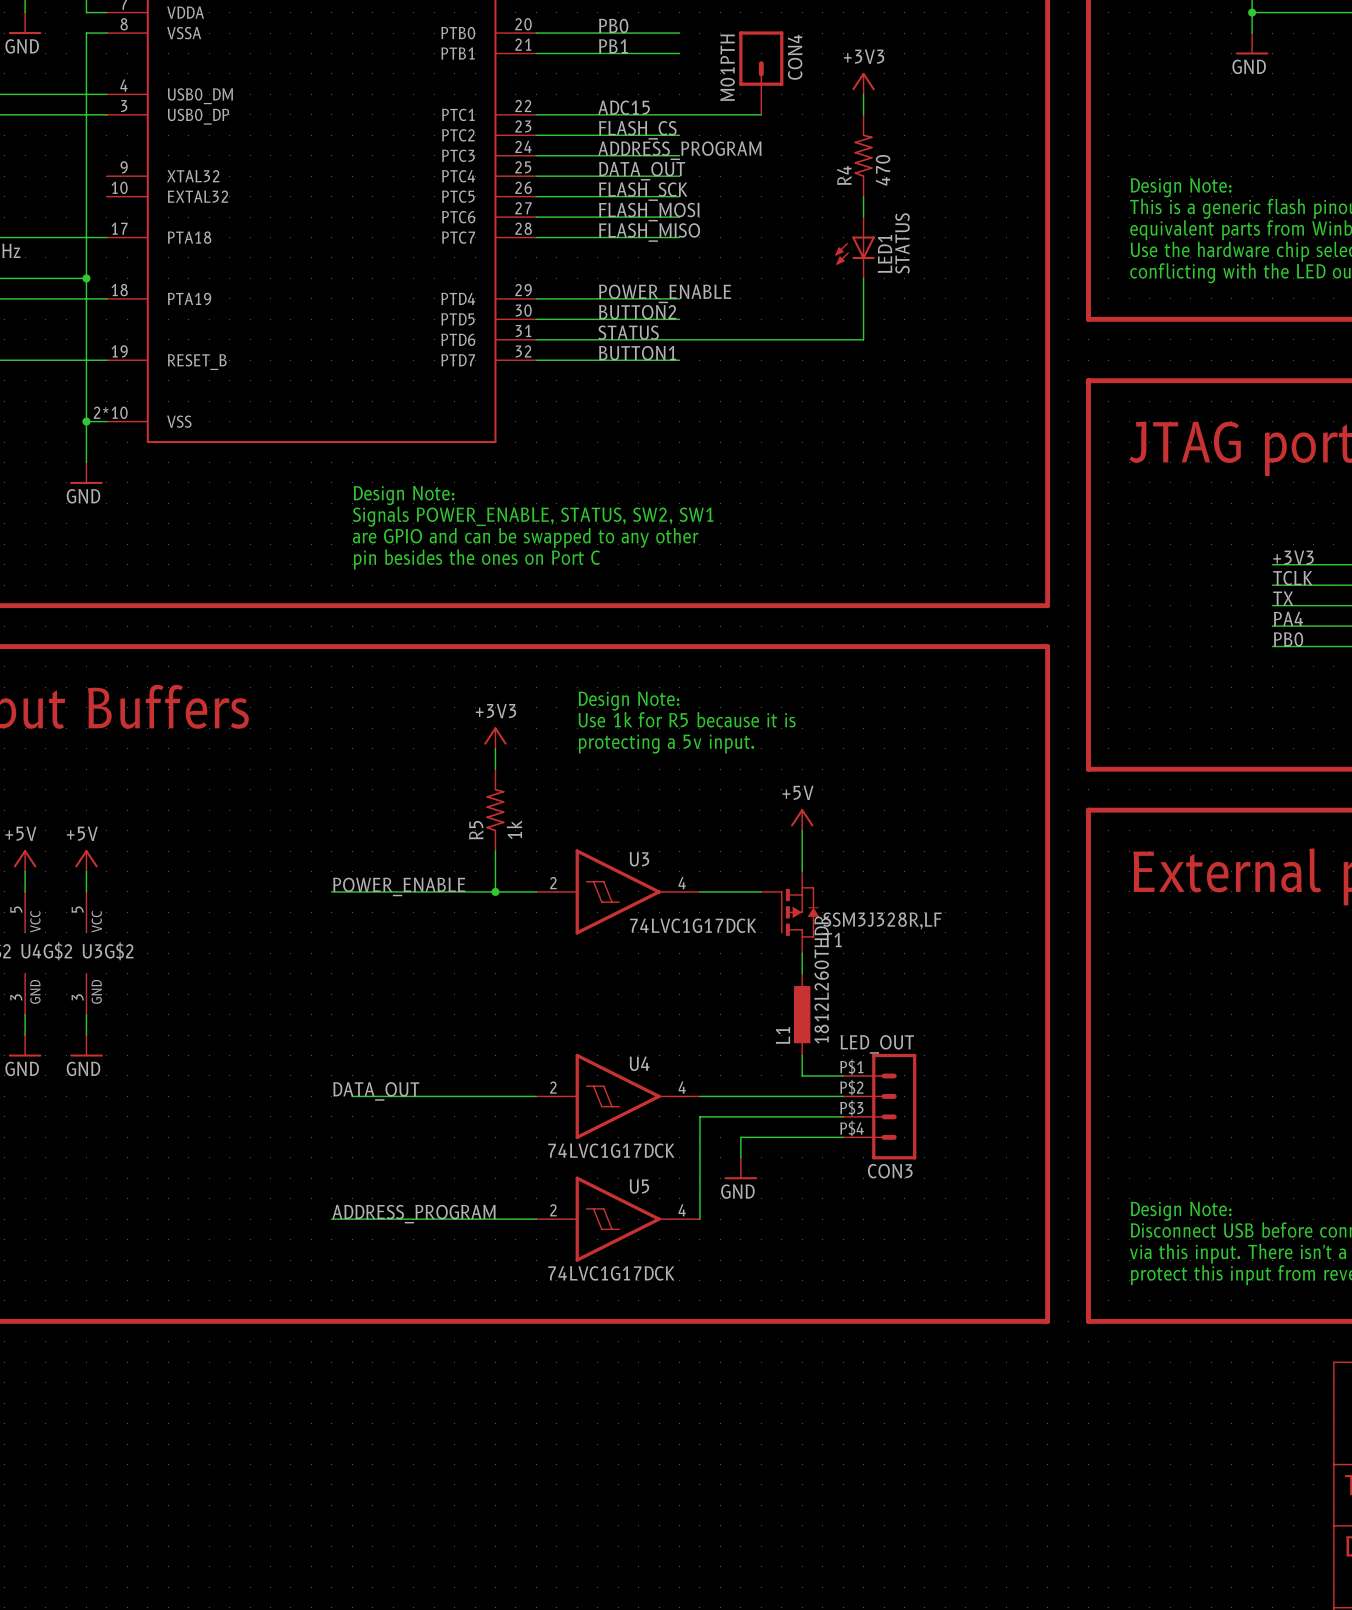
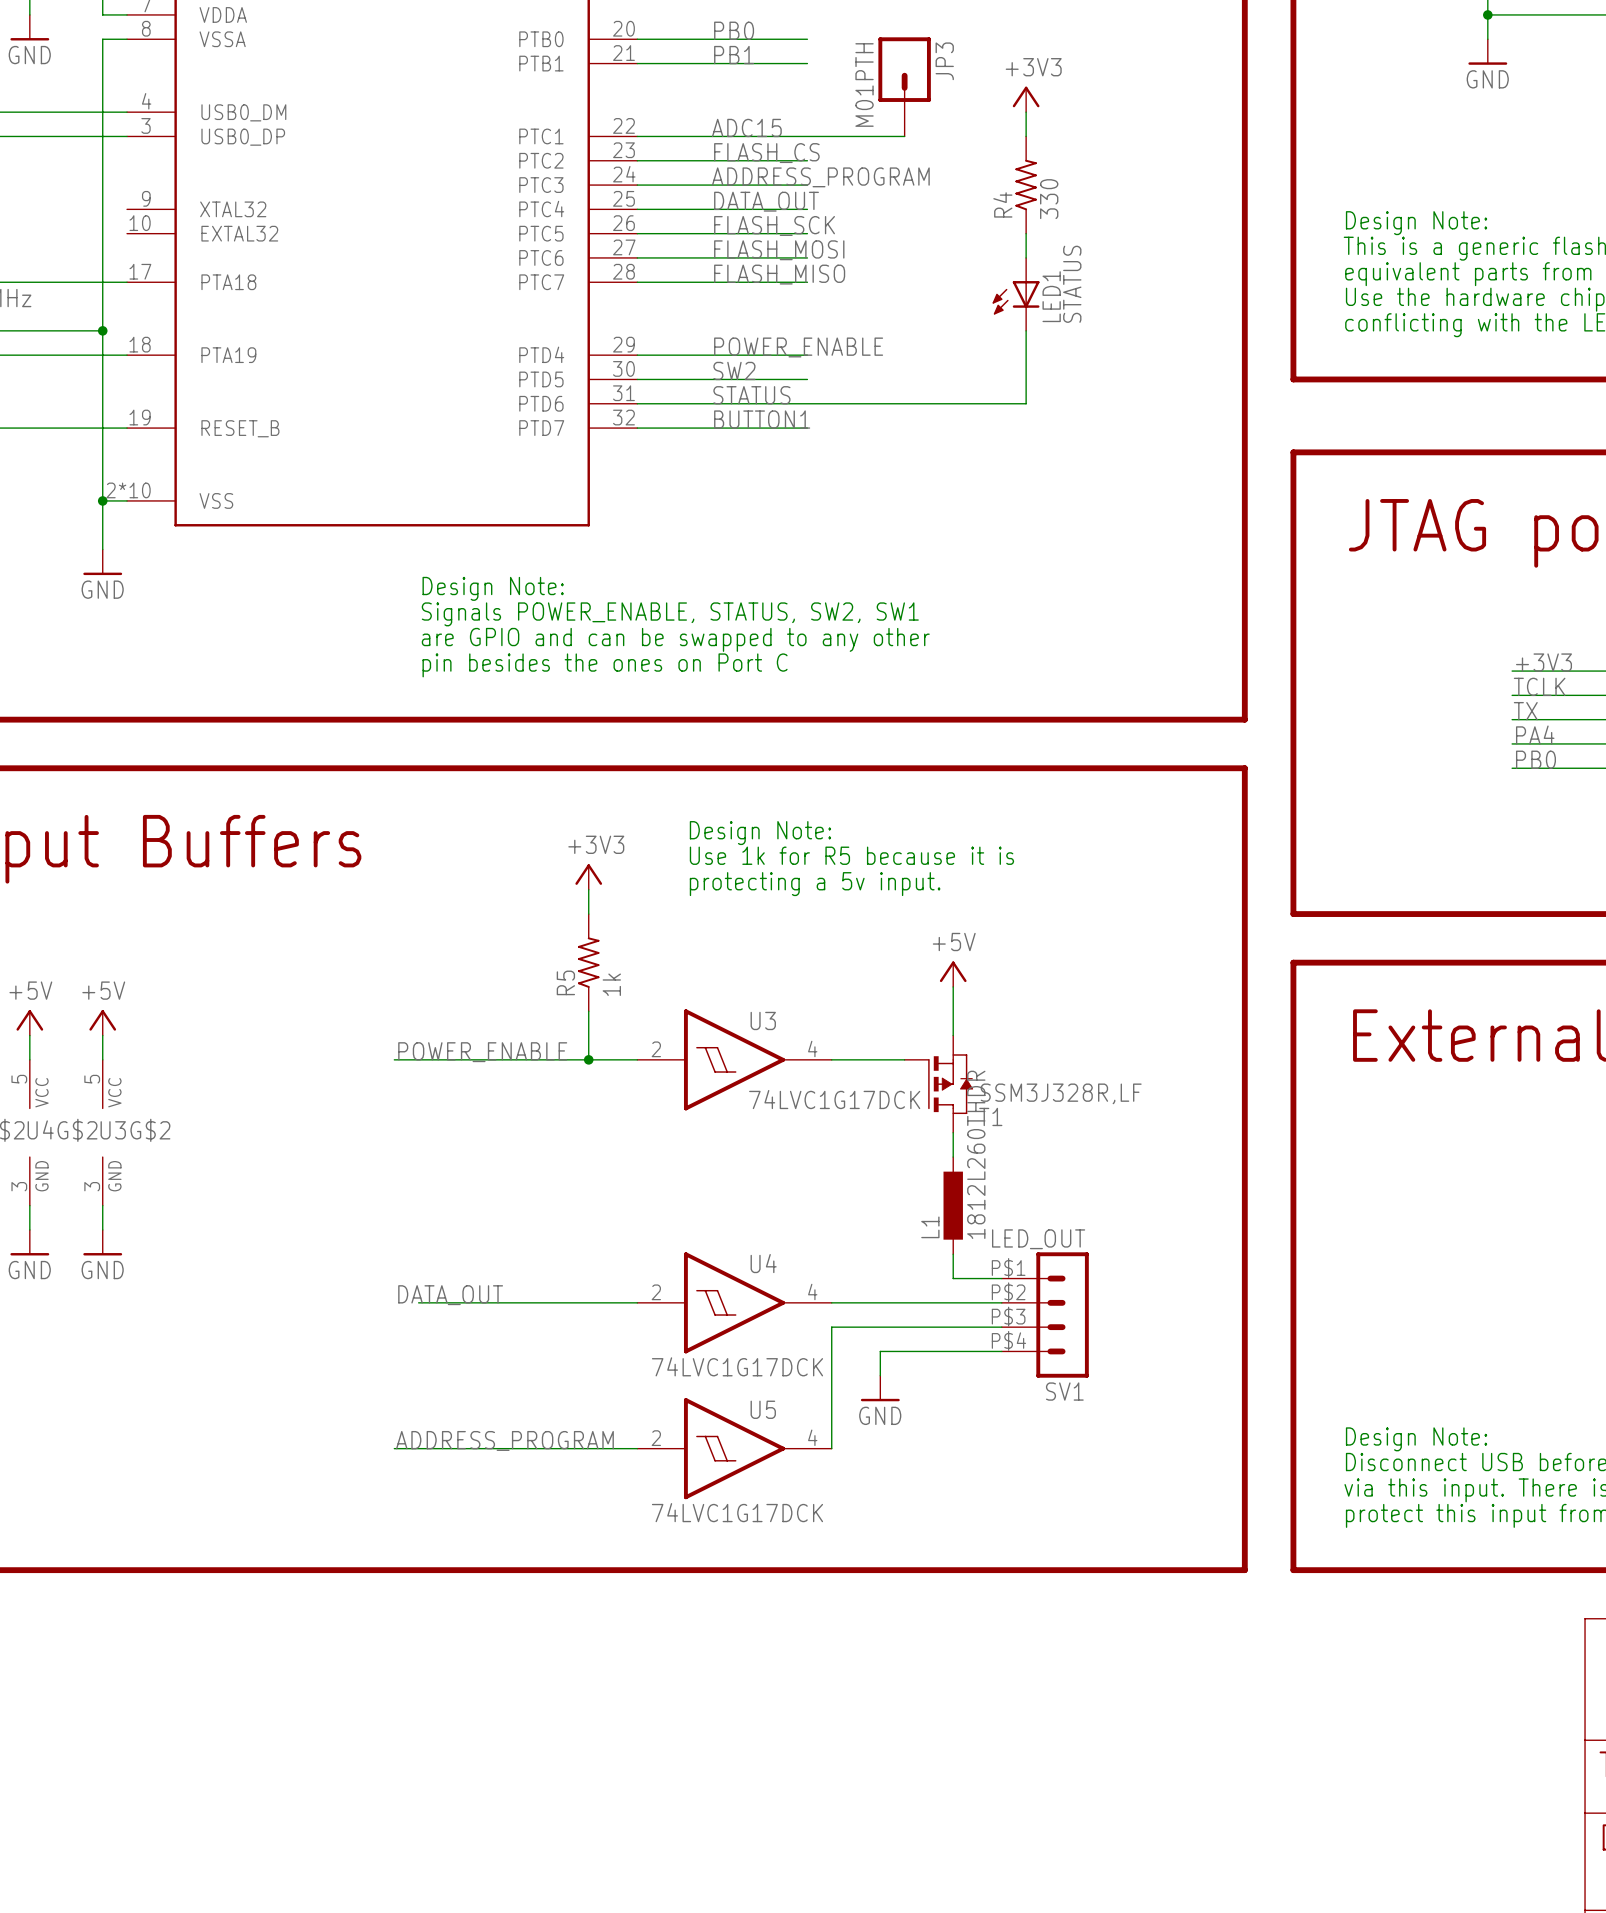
CON4 name: CON4 (795, 57) -> JP3 (944, 61)
R4 value: 470 (883, 170) -> 330 (1049, 199)
label: BUTTON2 (637, 312) -> SW2 (734, 370)
CON3 name: CON3 (890, 1171) -> SV1 (1064, 1391)

